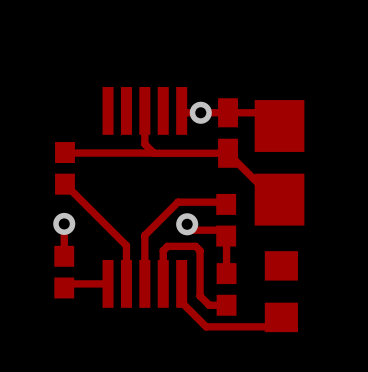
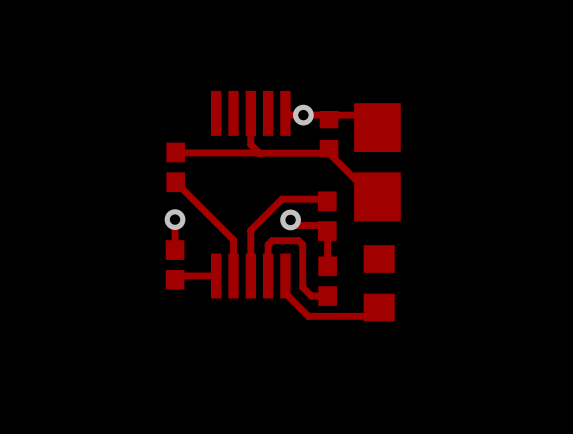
part footprint: [218, 98, 238, 168] -> [319, 110, 339, 158]

